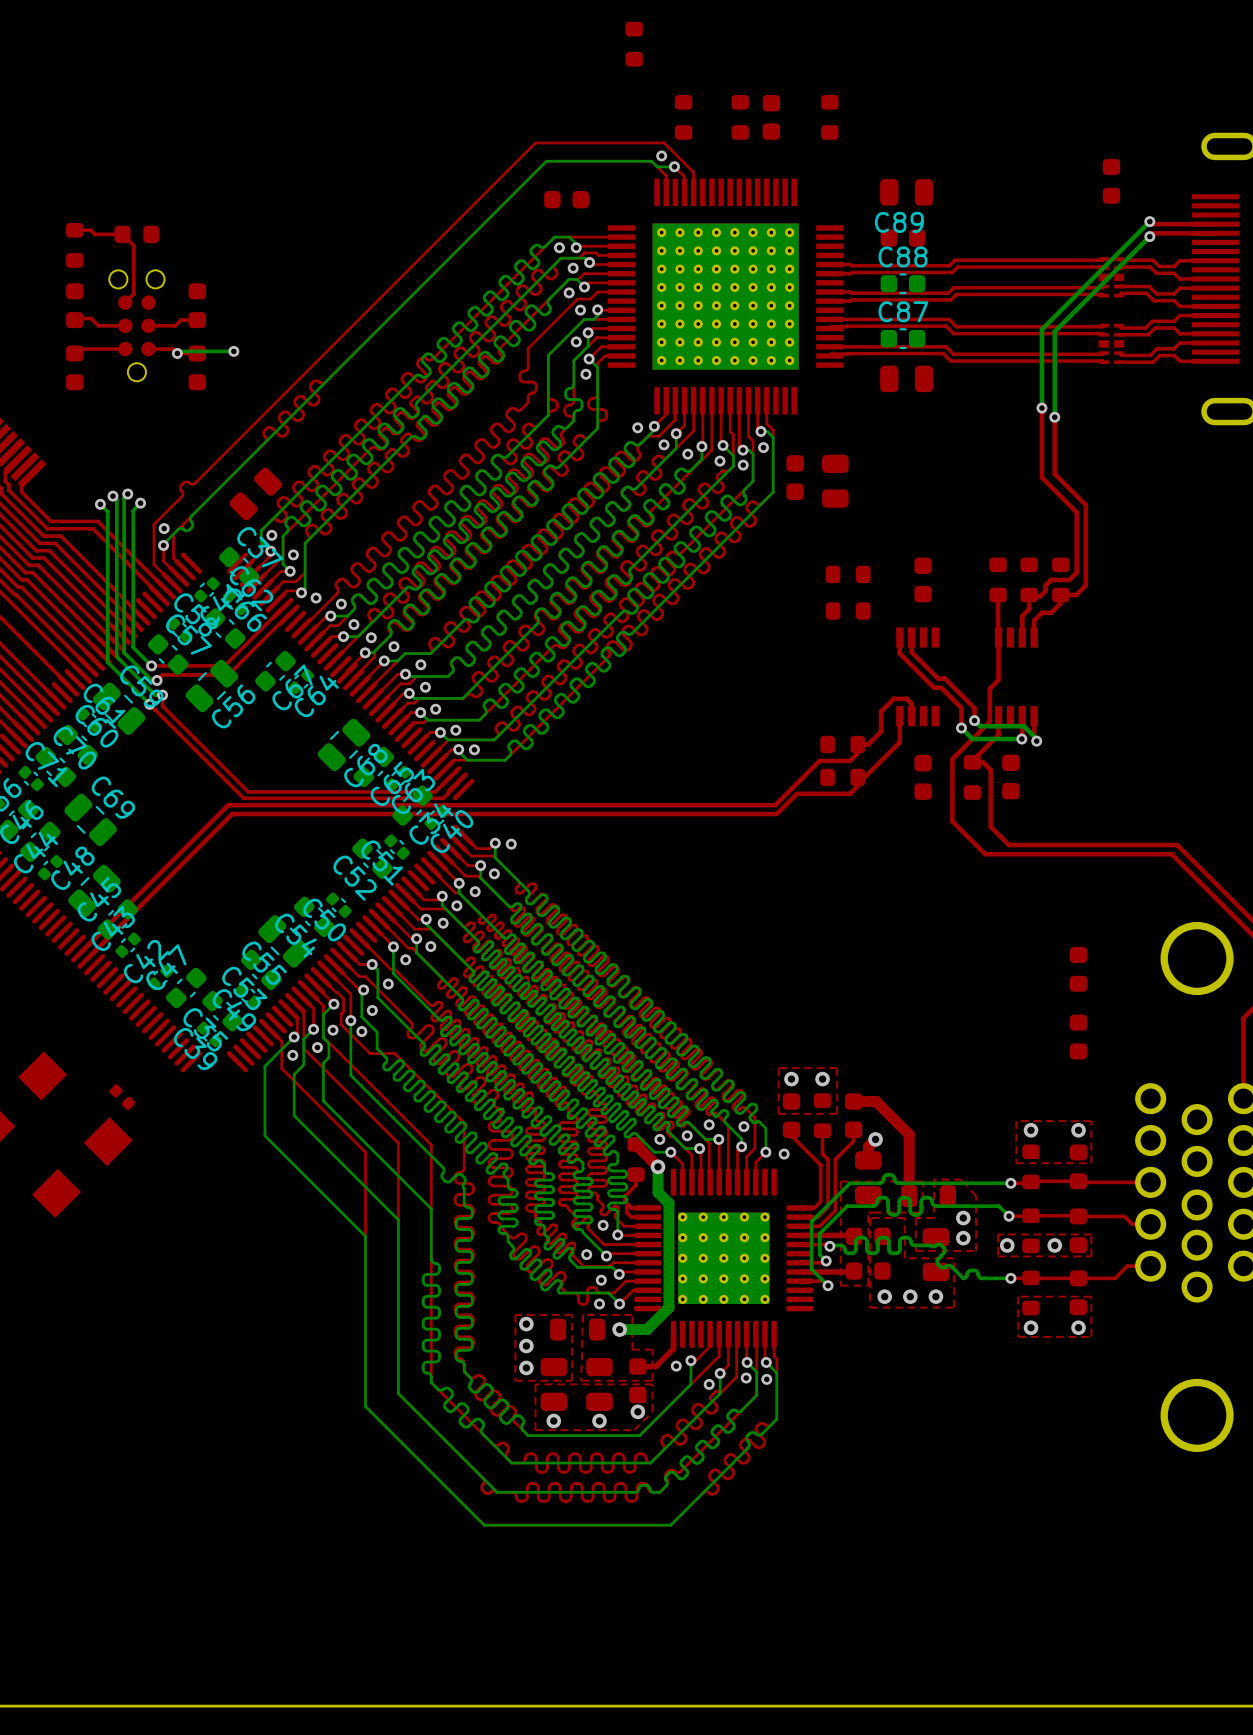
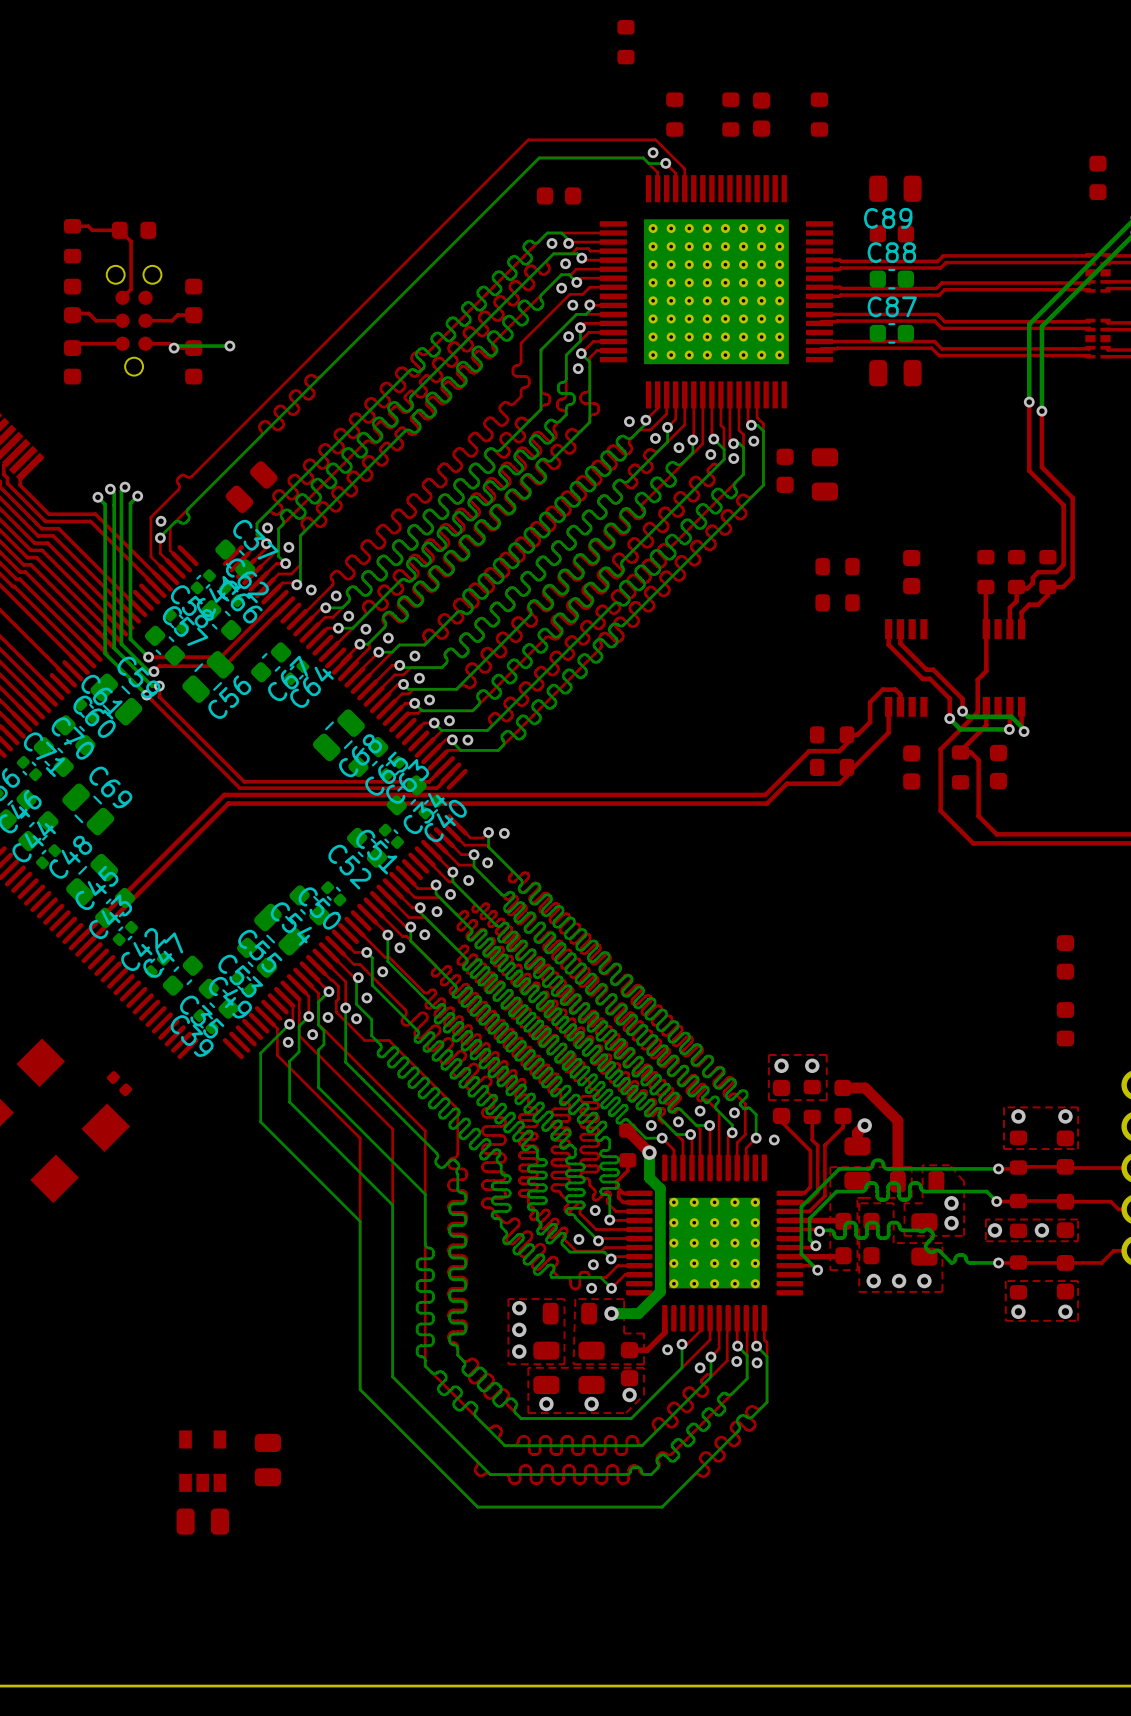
part: none -> (267, 1460)
part: none -> (202, 1461)
part: none -> (202, 1521)

